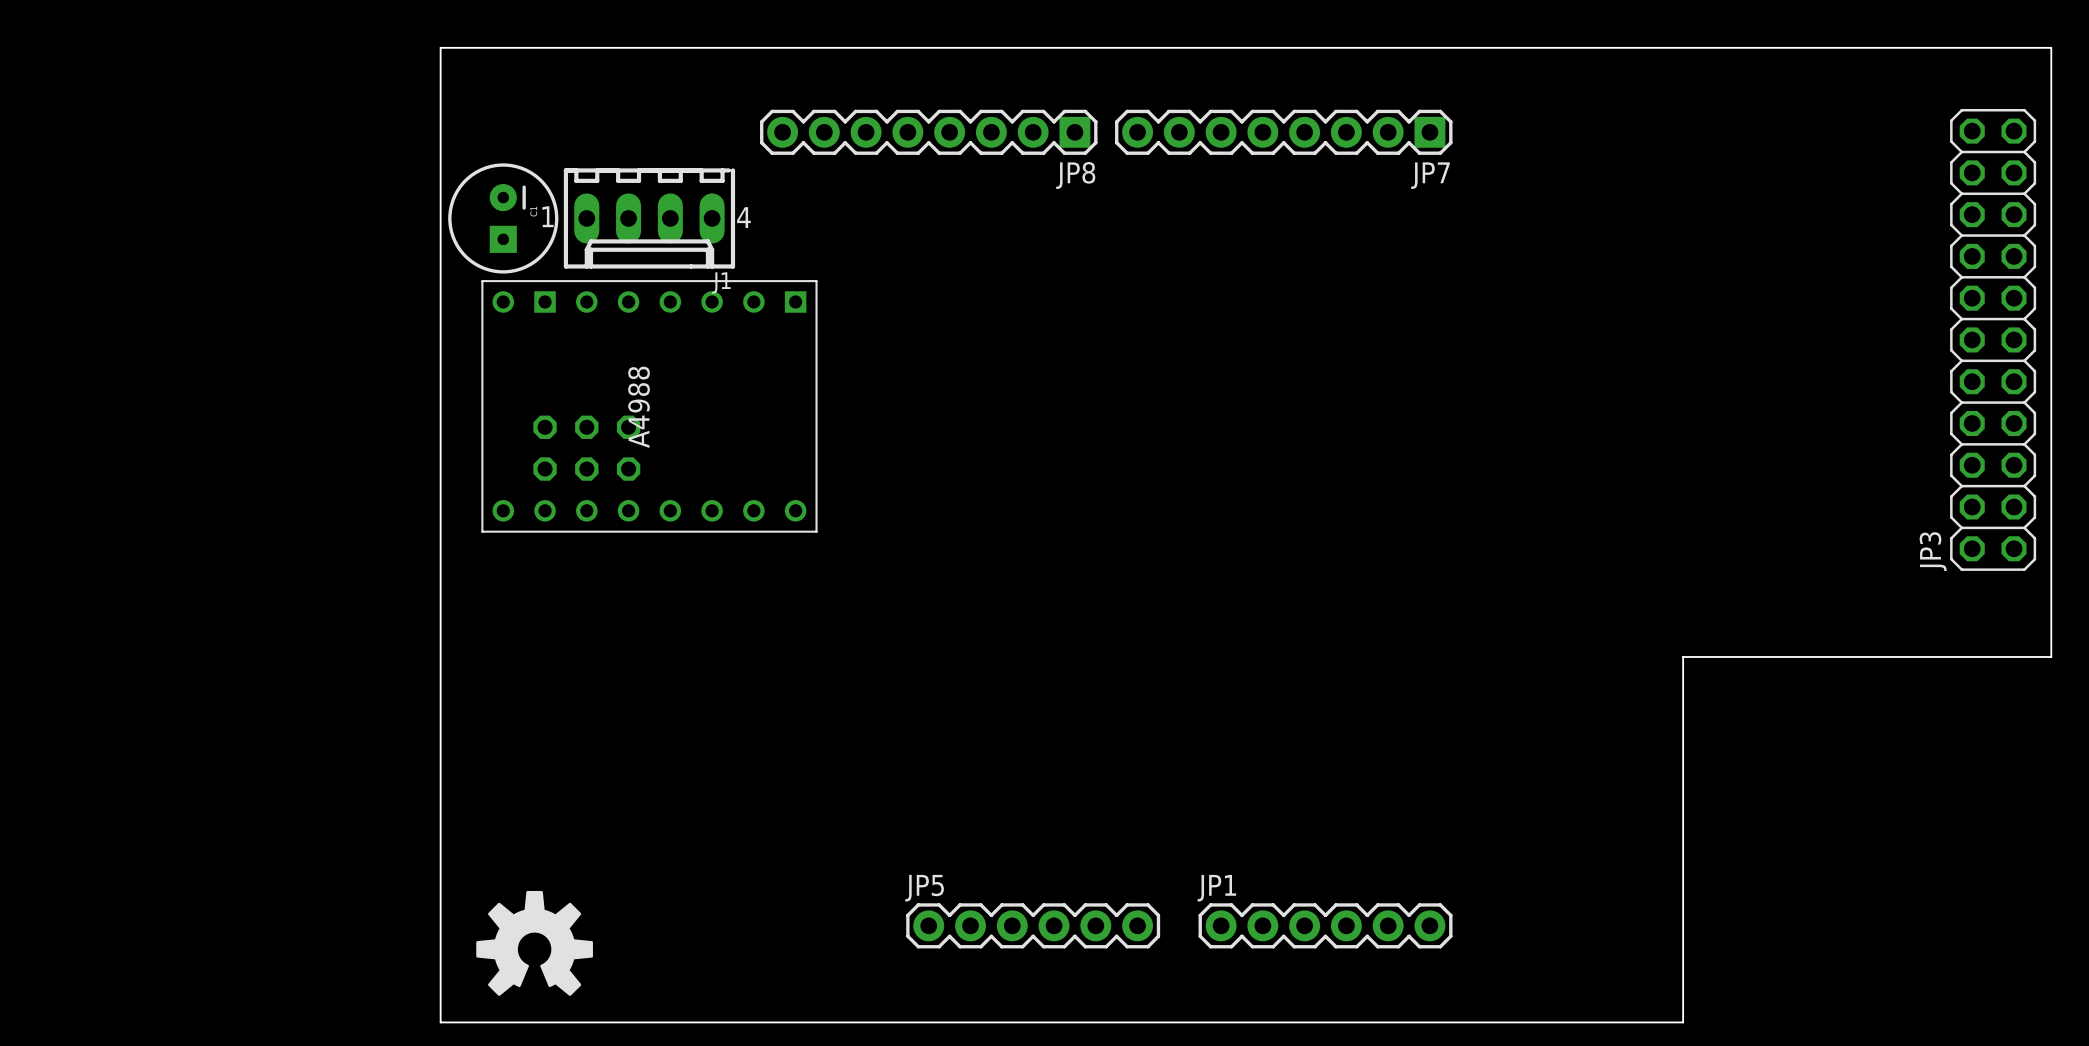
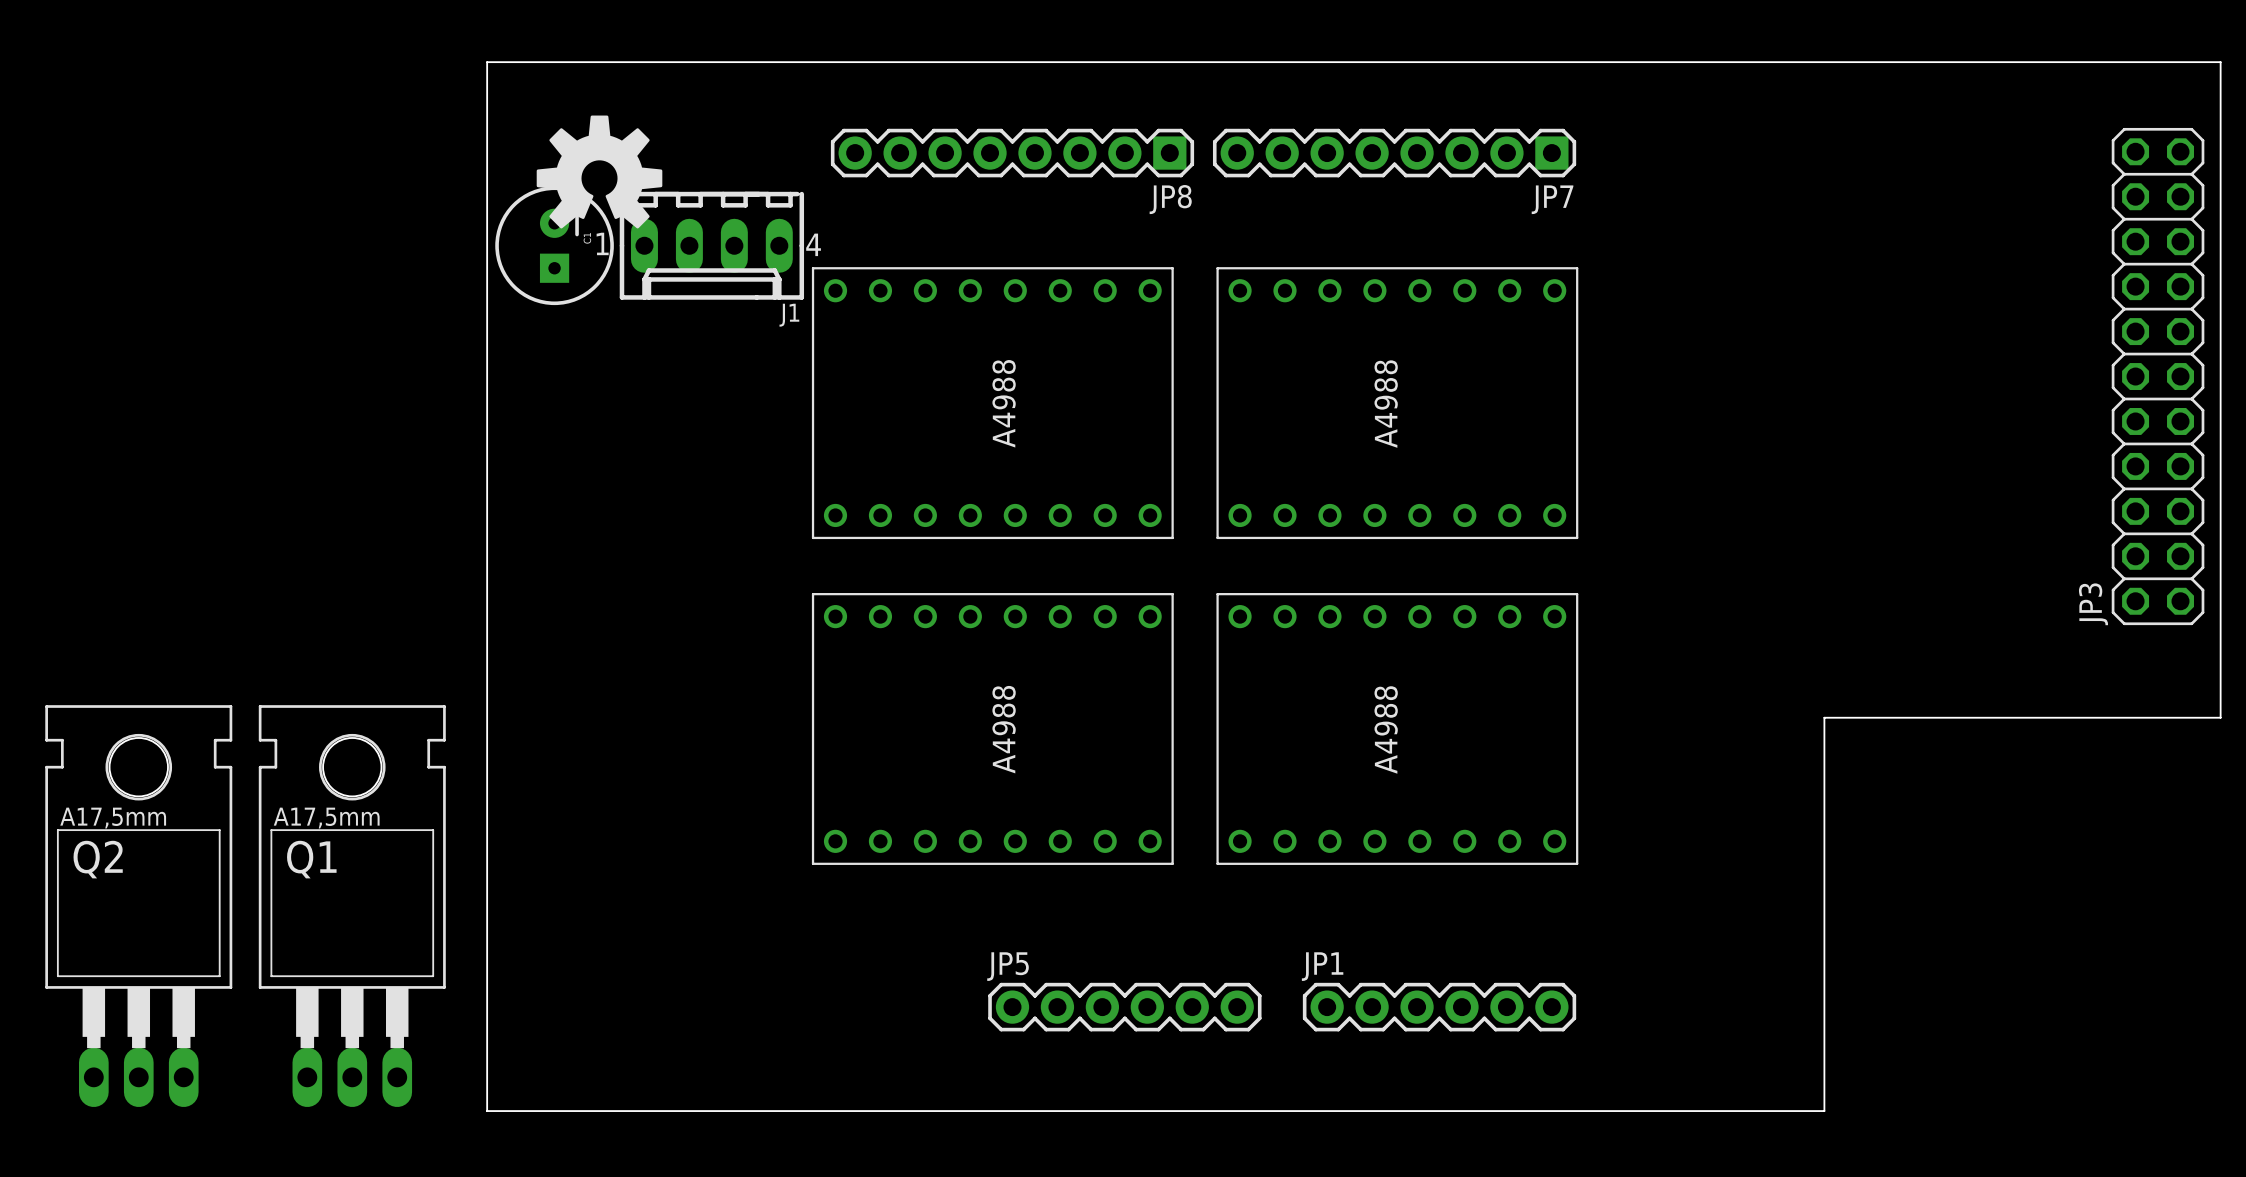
drawing: none -> [536, 115, 663, 229]
part: none -> (992, 403)
part: none -> (1397, 403)
part: (649, 406) -> none
part: (586, 448) -> none
part: none -> (992, 728)
part: none -> (1397, 728)
Q2: none -> (138, 906)
Q1: none -> (352, 906)
drawing: [476, 890, 593, 996] -> none

